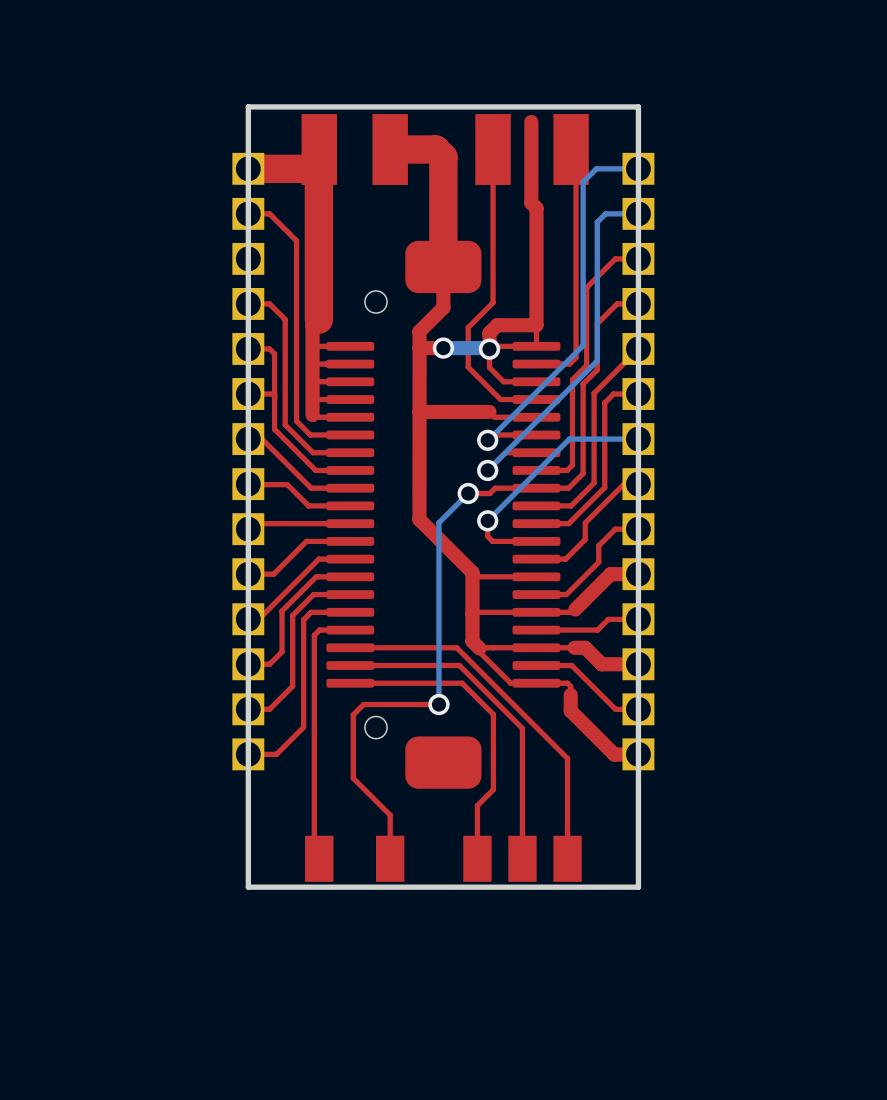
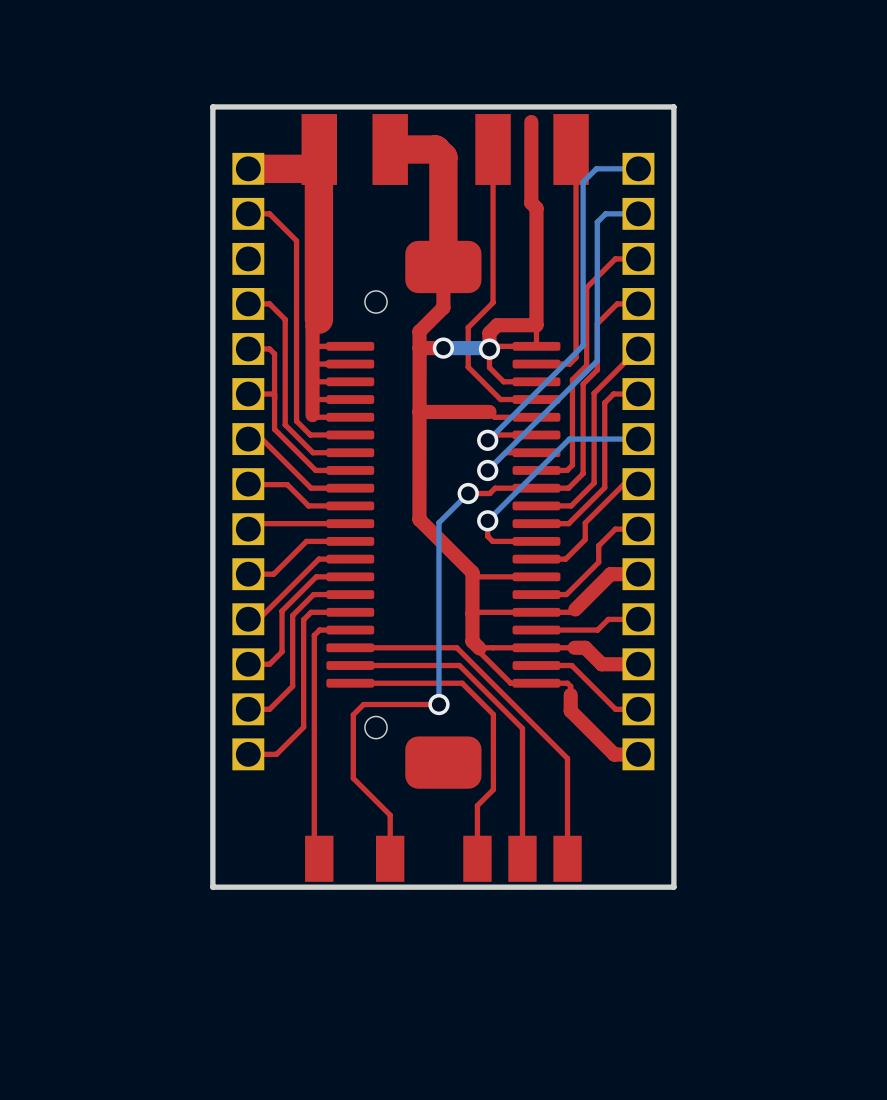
board edge: (248, 106) (248, 887) -> (248, 106) (212, 106) (212, 887) (248, 887)
board edge: (638, 106) (638, 887) -> (638, 106) (673, 106) (673, 887) (638, 887)

